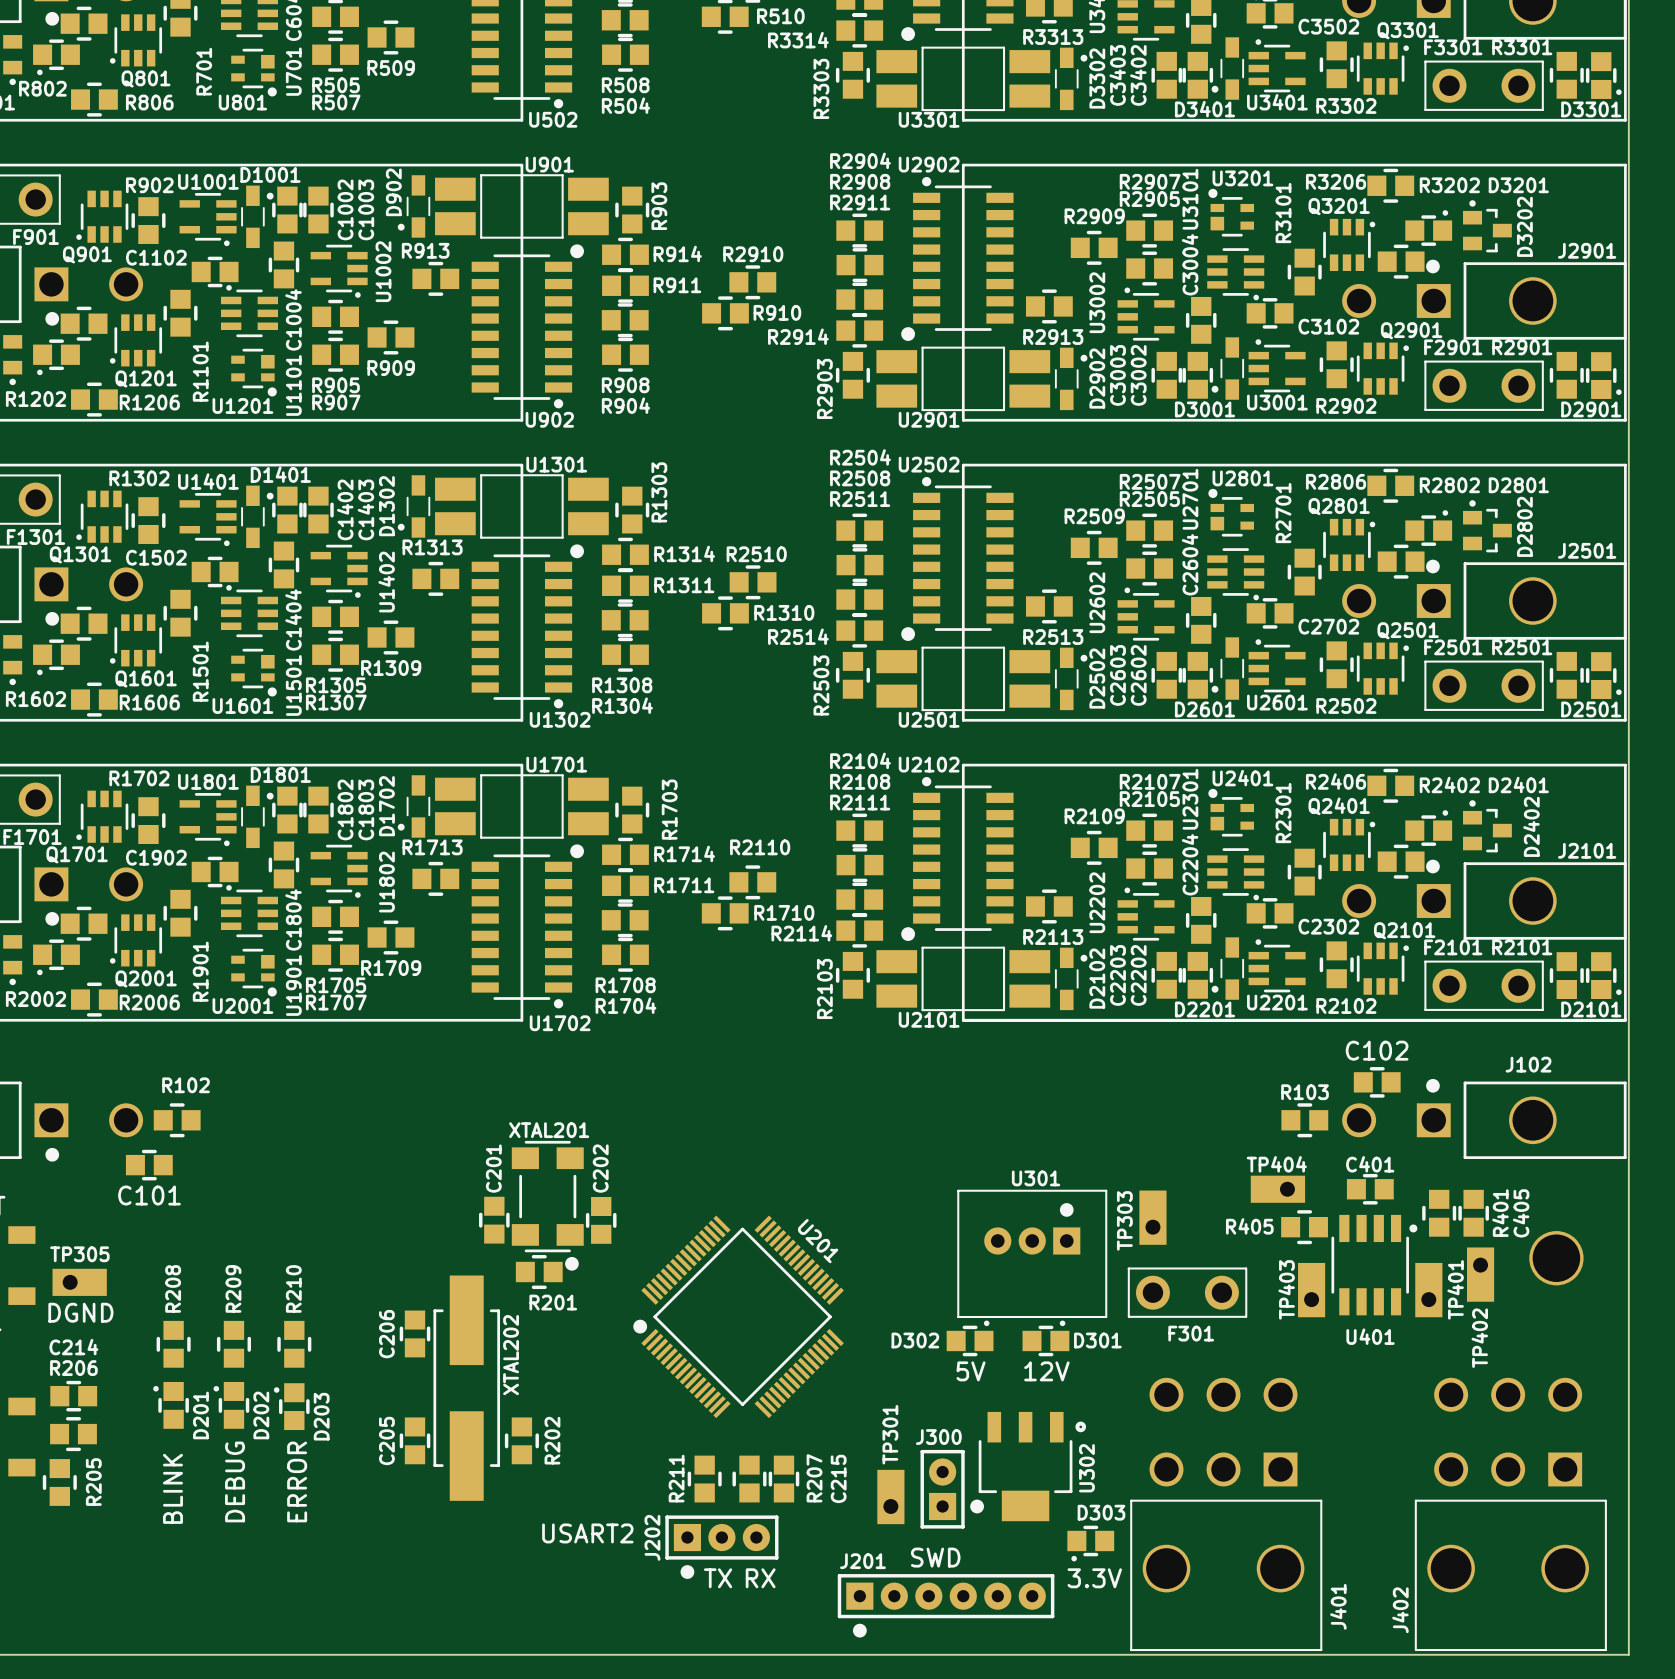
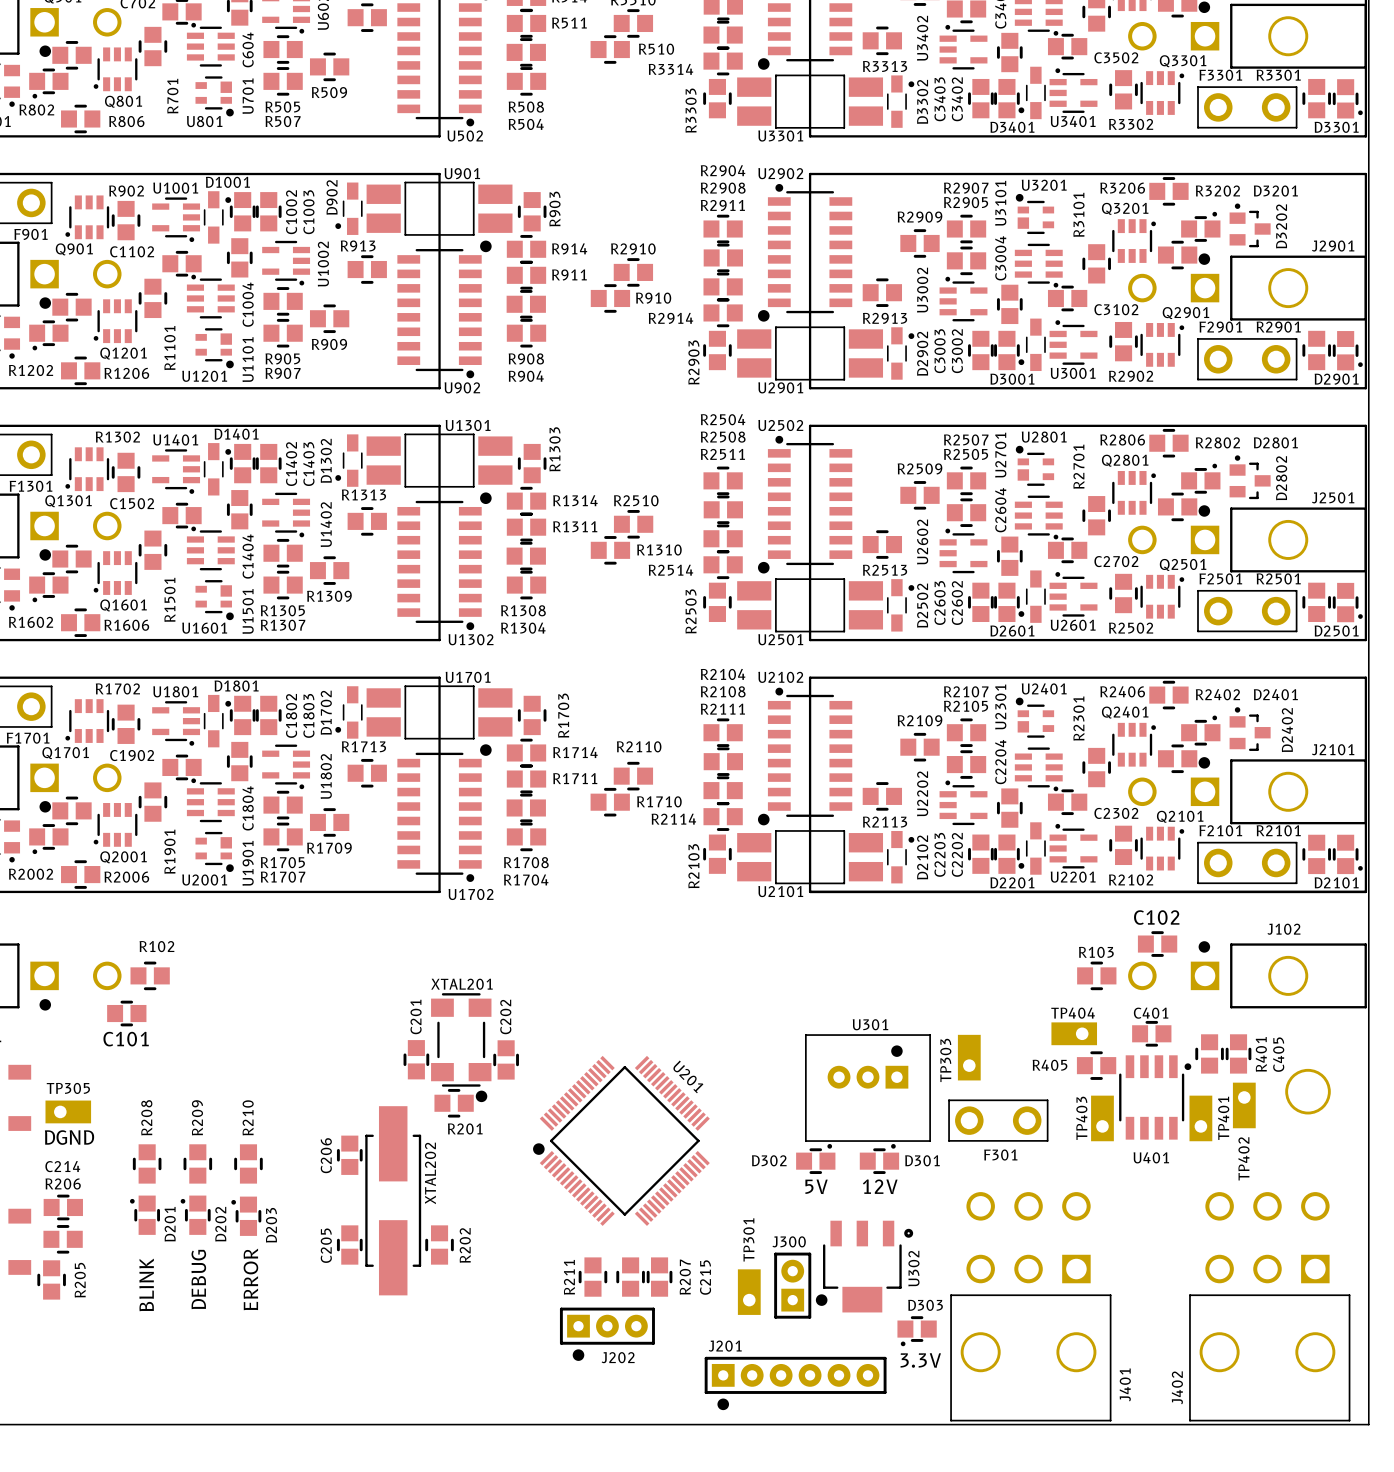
text: USART2 (587, 1533) -> none
J202 name rotation: 0° (652, 1537) -> 90° clockwise (618, 1357)
J202 name position: J202 (652, 1537) -> J202 (618, 1357)
text: SWD (935, 1557) -> none
text: TX (718, 1578) -> none
text: RX (760, 1578) -> none

